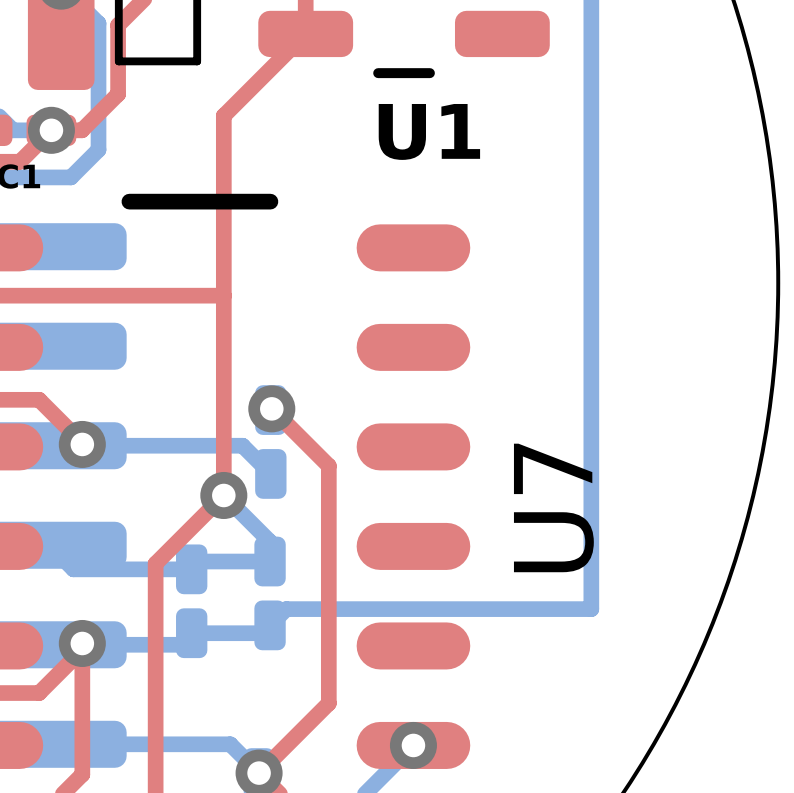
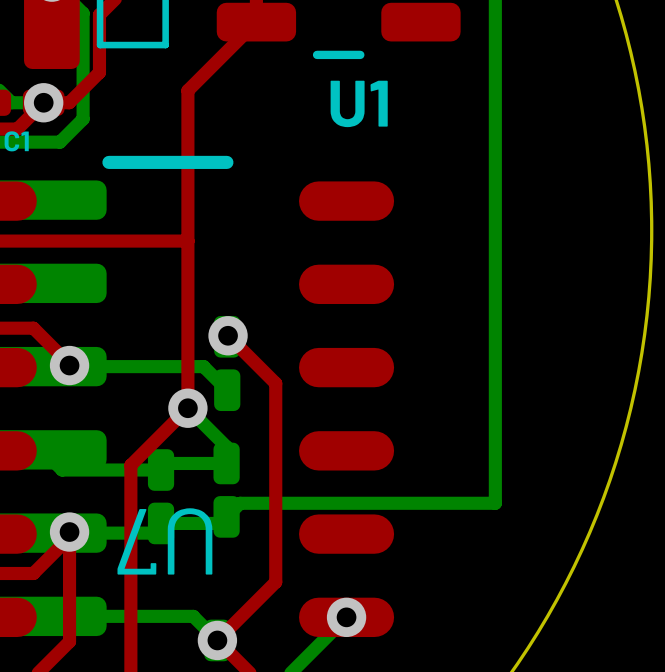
U7 name rotation: 0° (553, 507) -> 90° counterclockwise (164, 541)
U7 name position: U7 (553, 507) -> U7 (164, 541)

